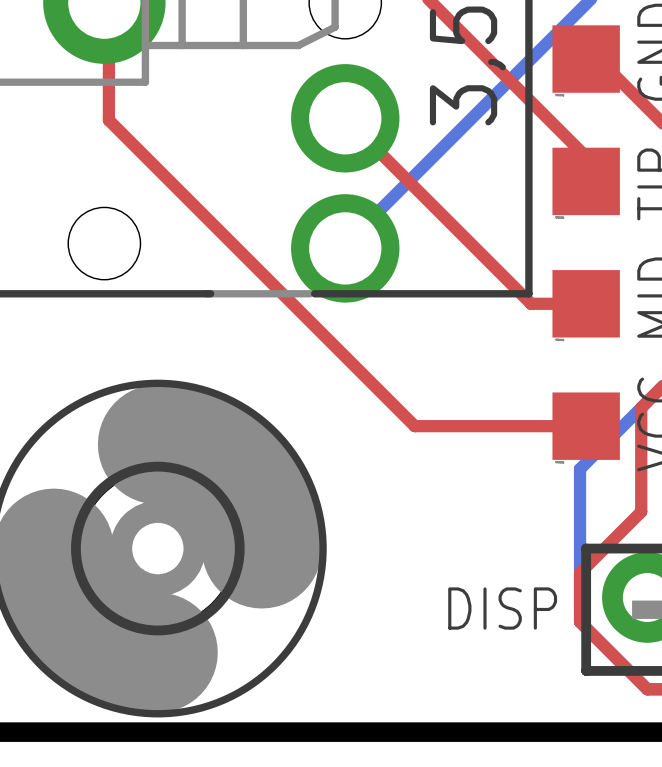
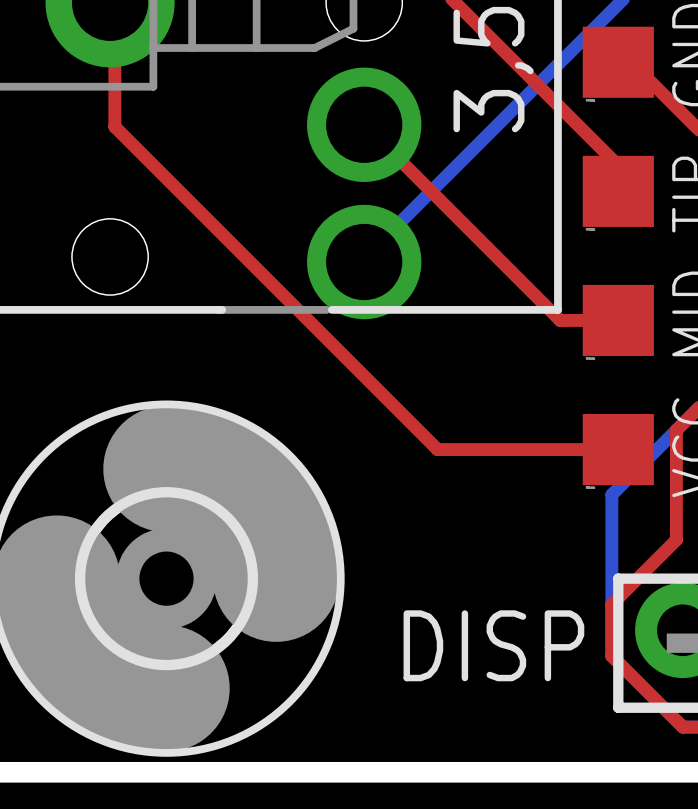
text: DISP (502, 608) -> none
DISP name: none -> DISP (493, 645)

